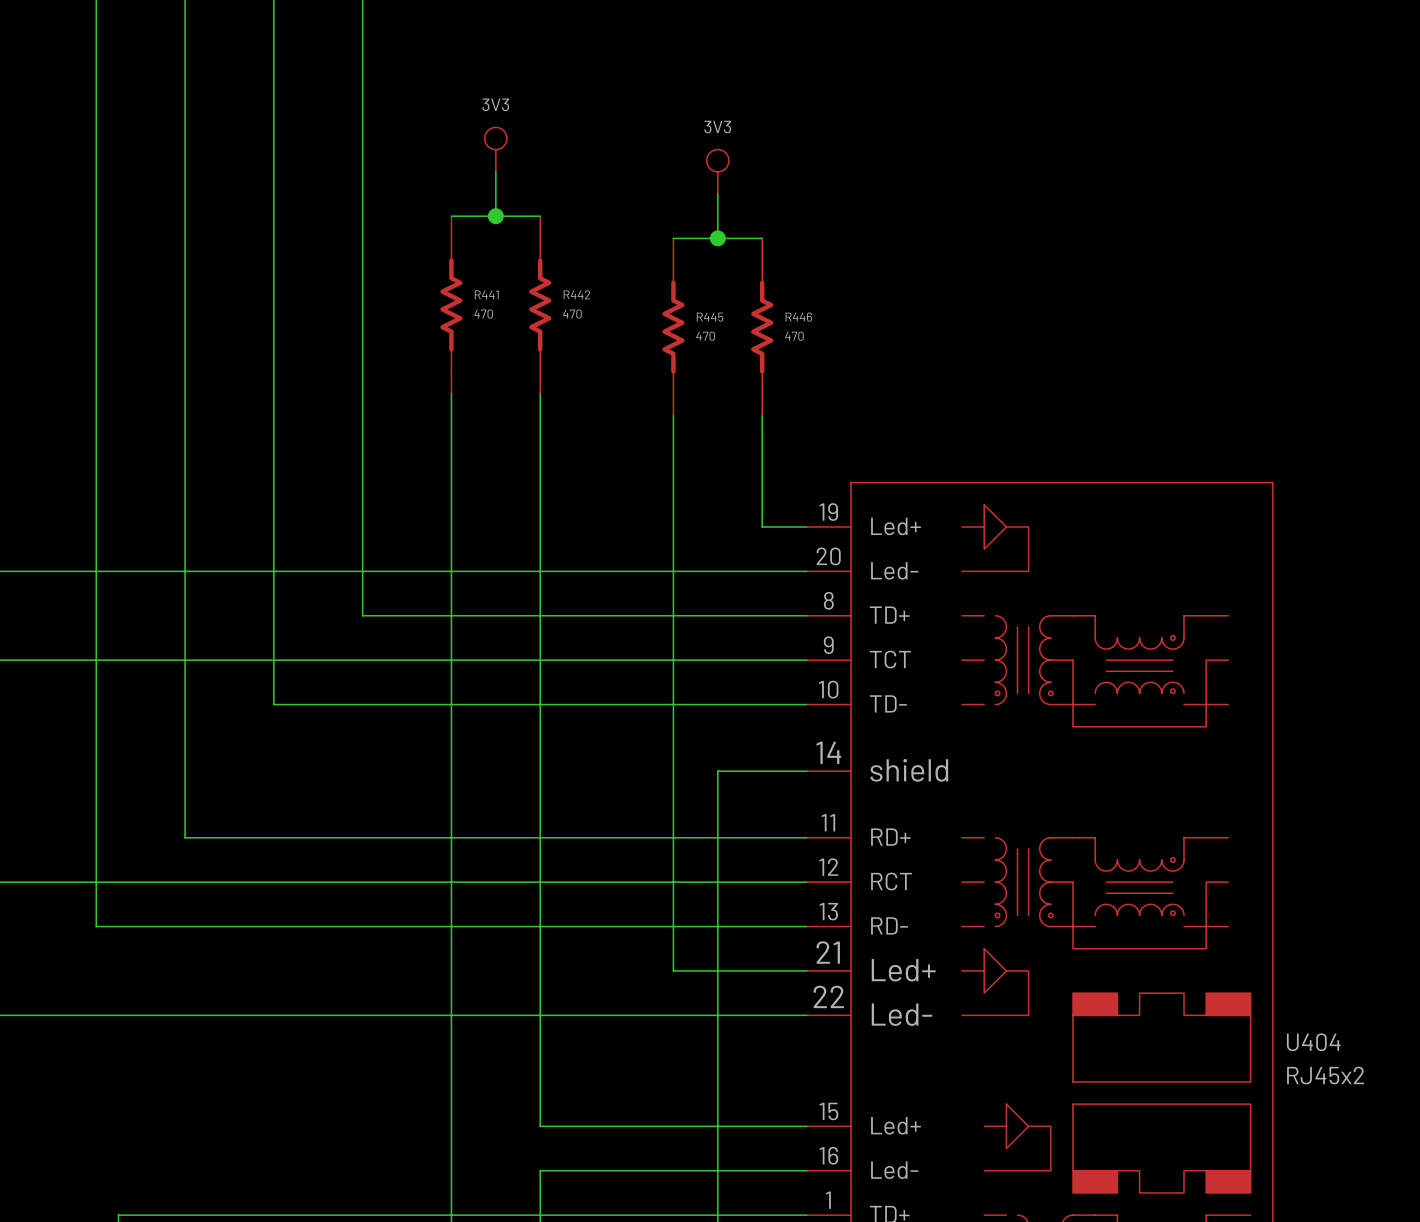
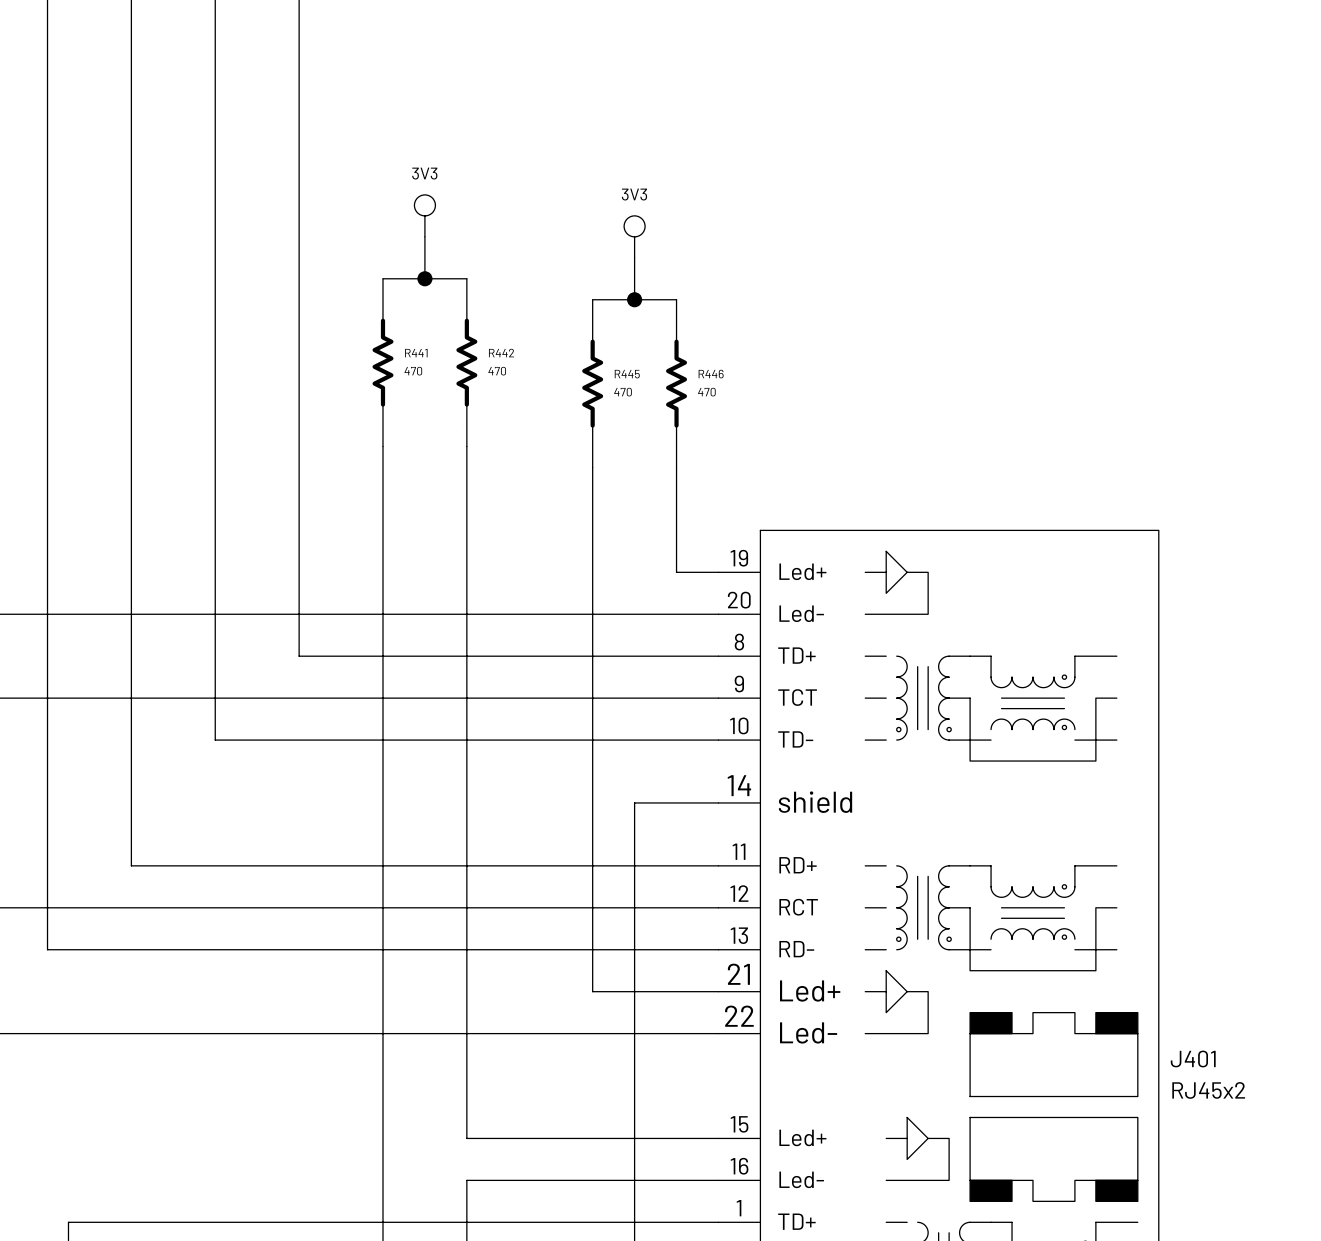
U404 name: U404 (1313, 1042) -> J401 (1193, 1059)

